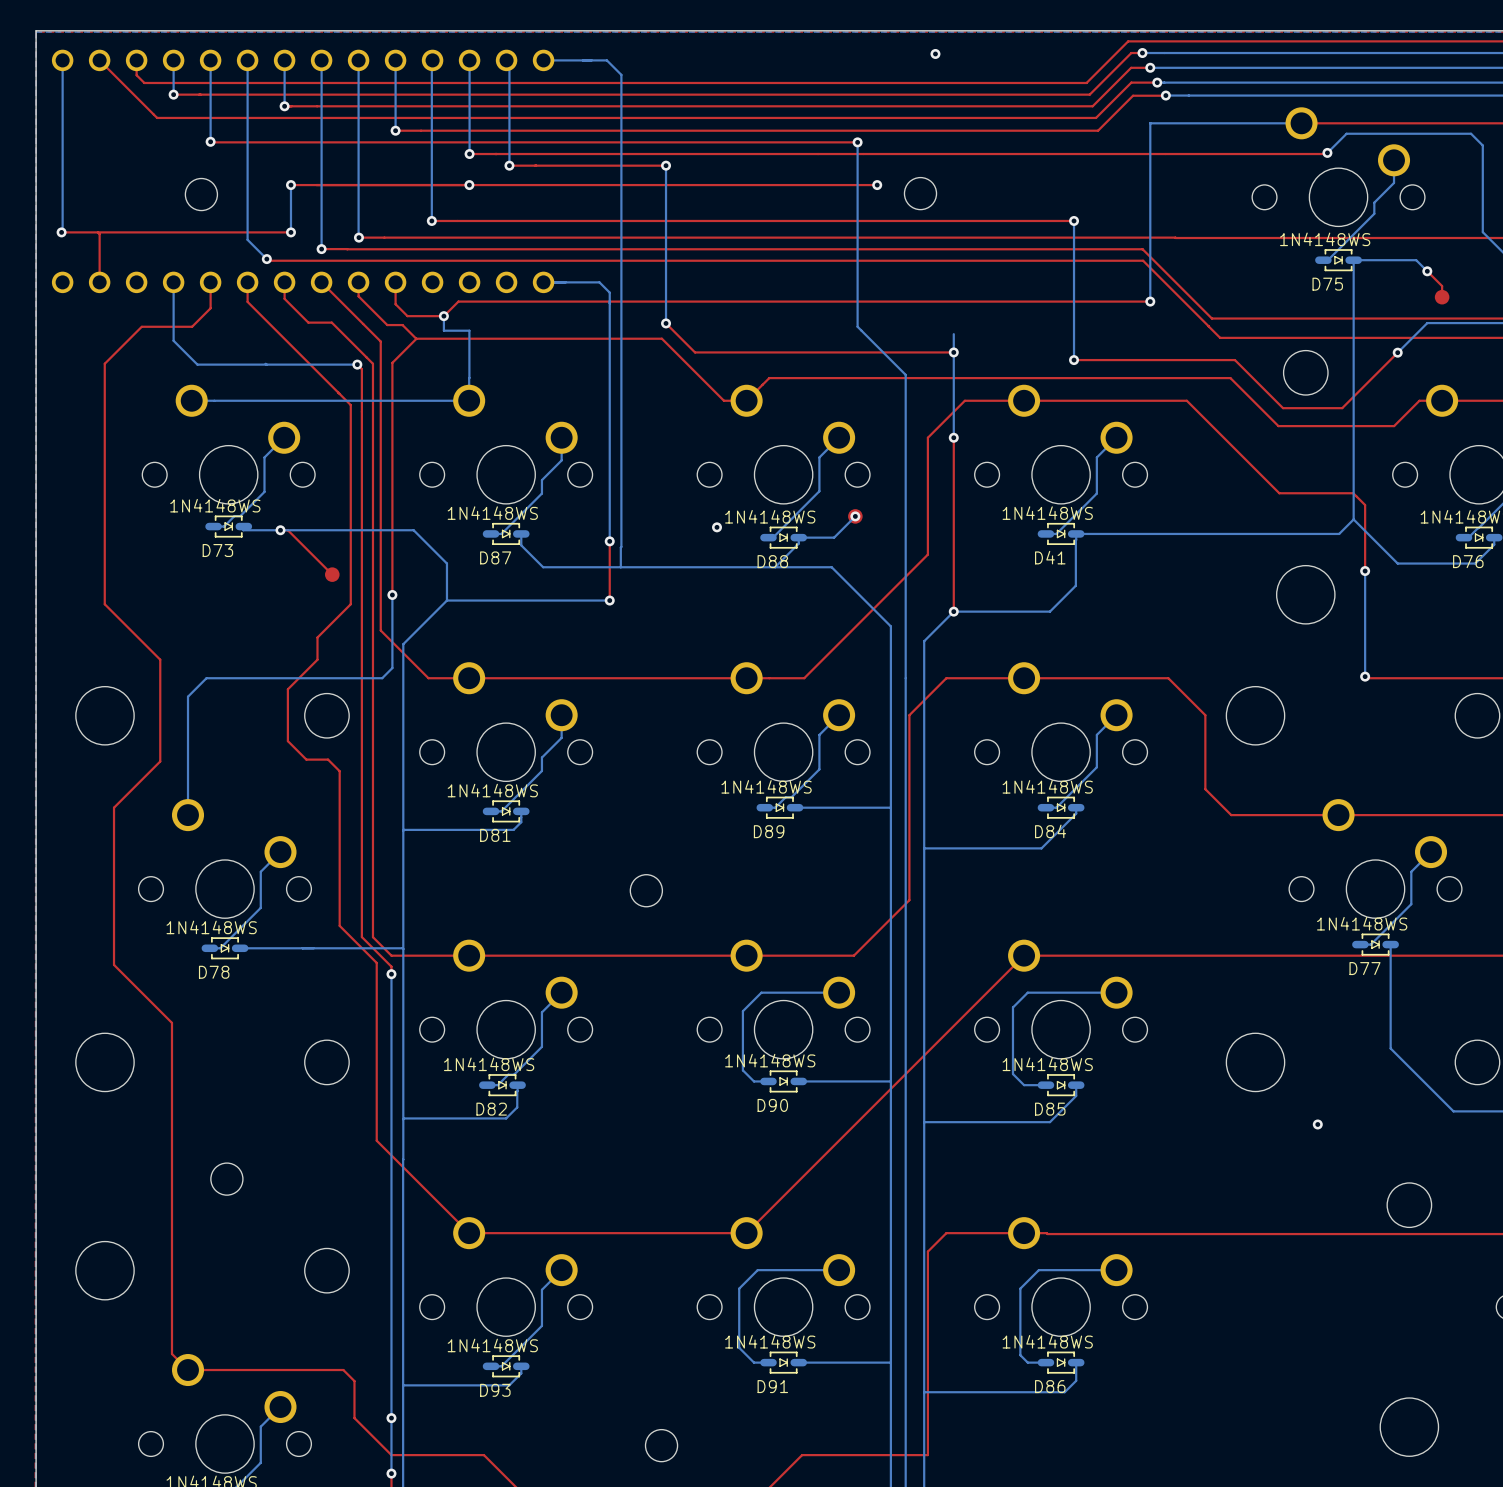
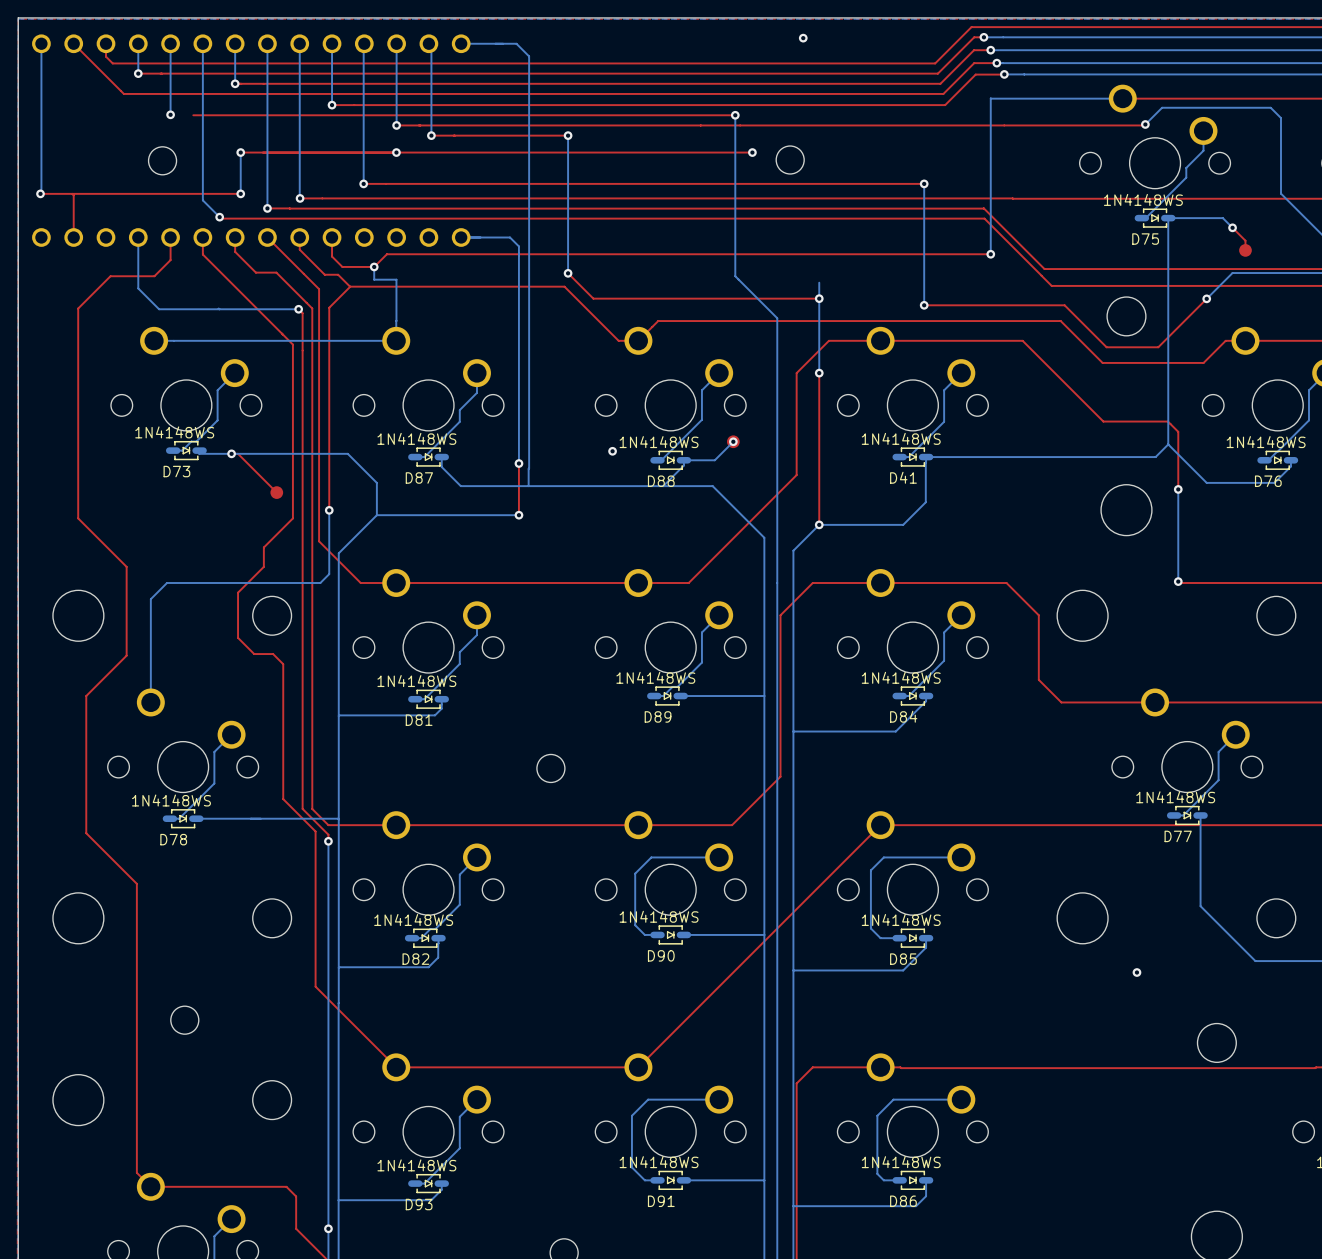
top track: (236, 142) (211, 142) -> none

